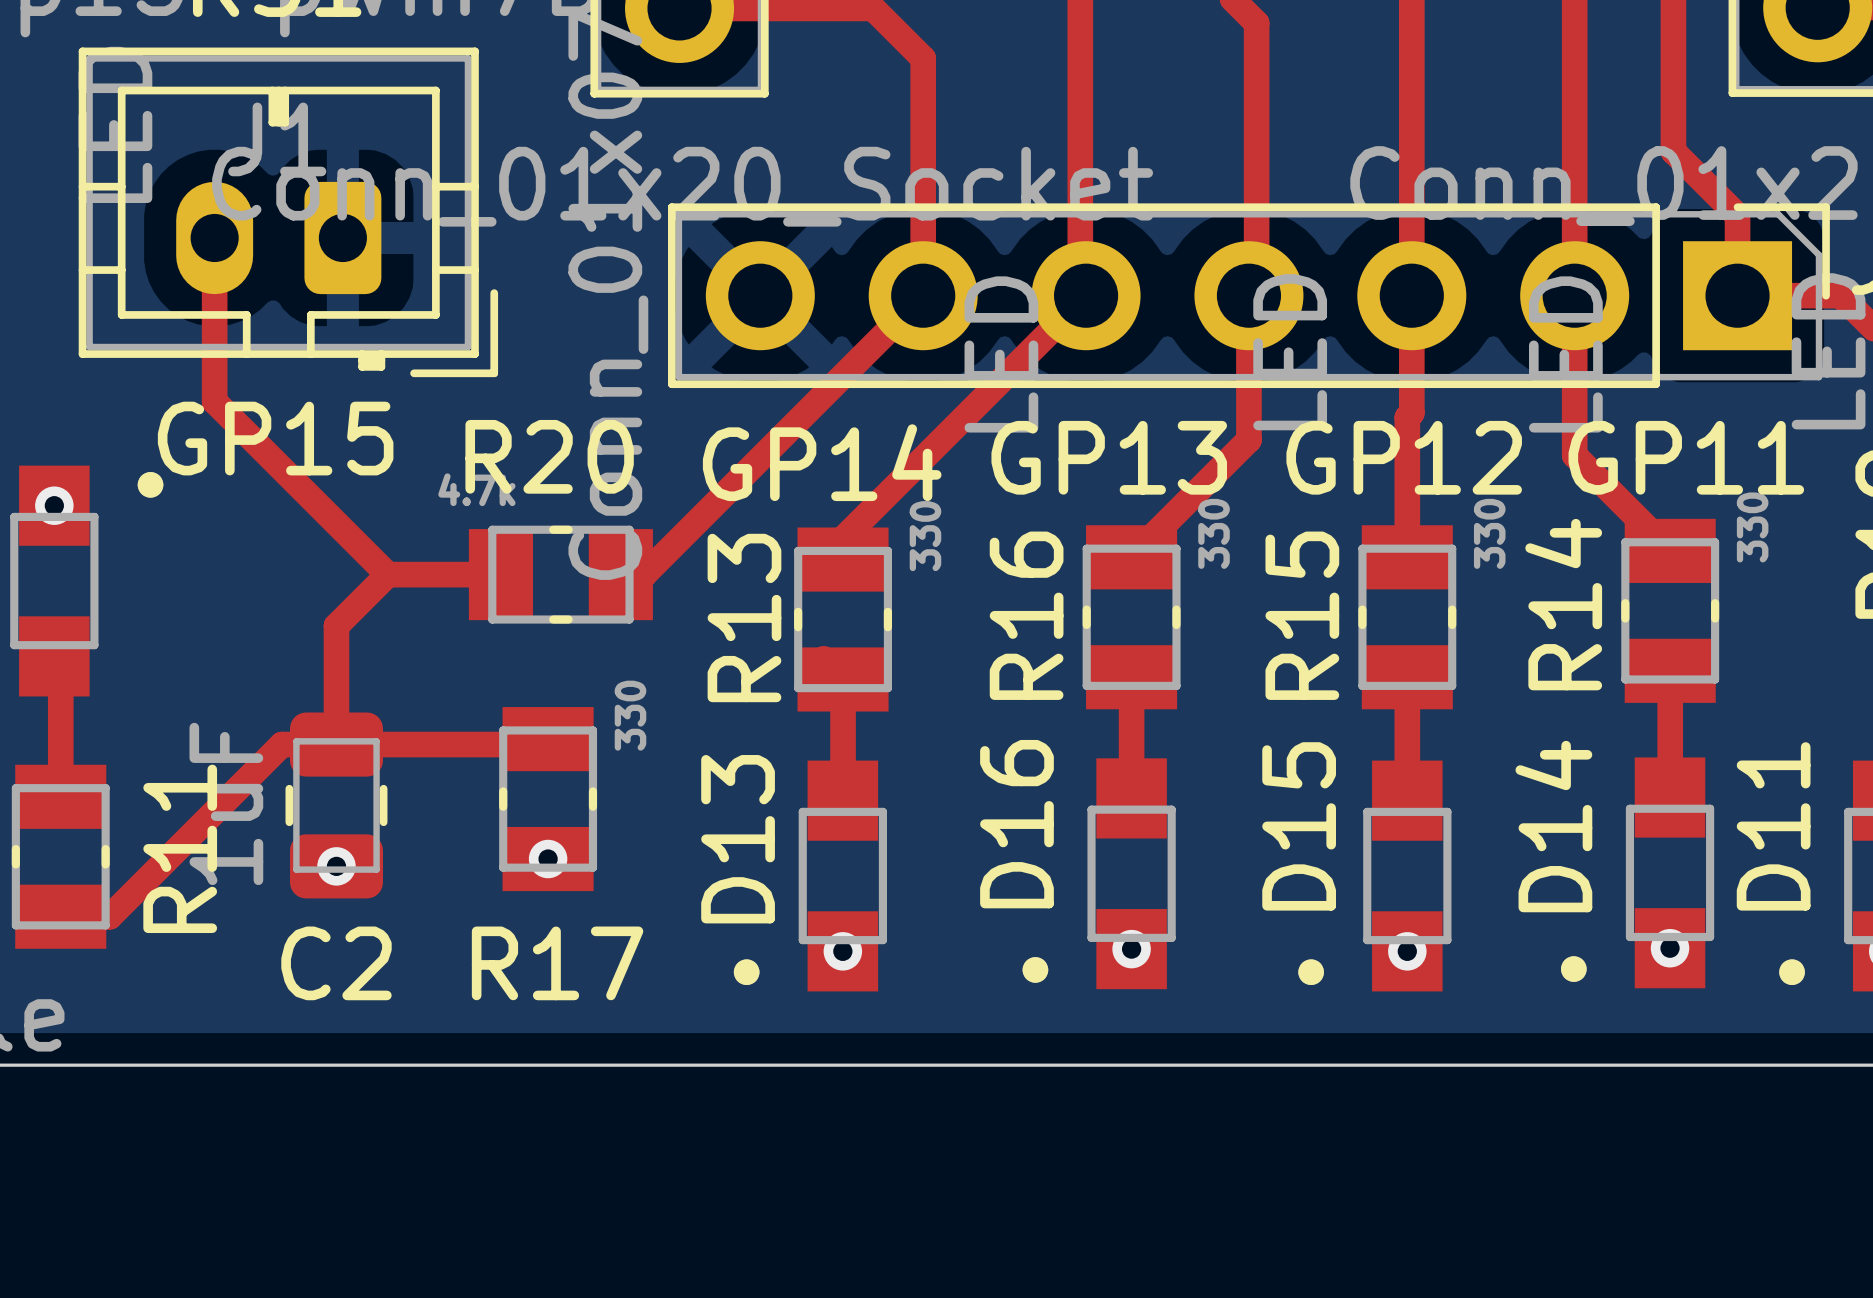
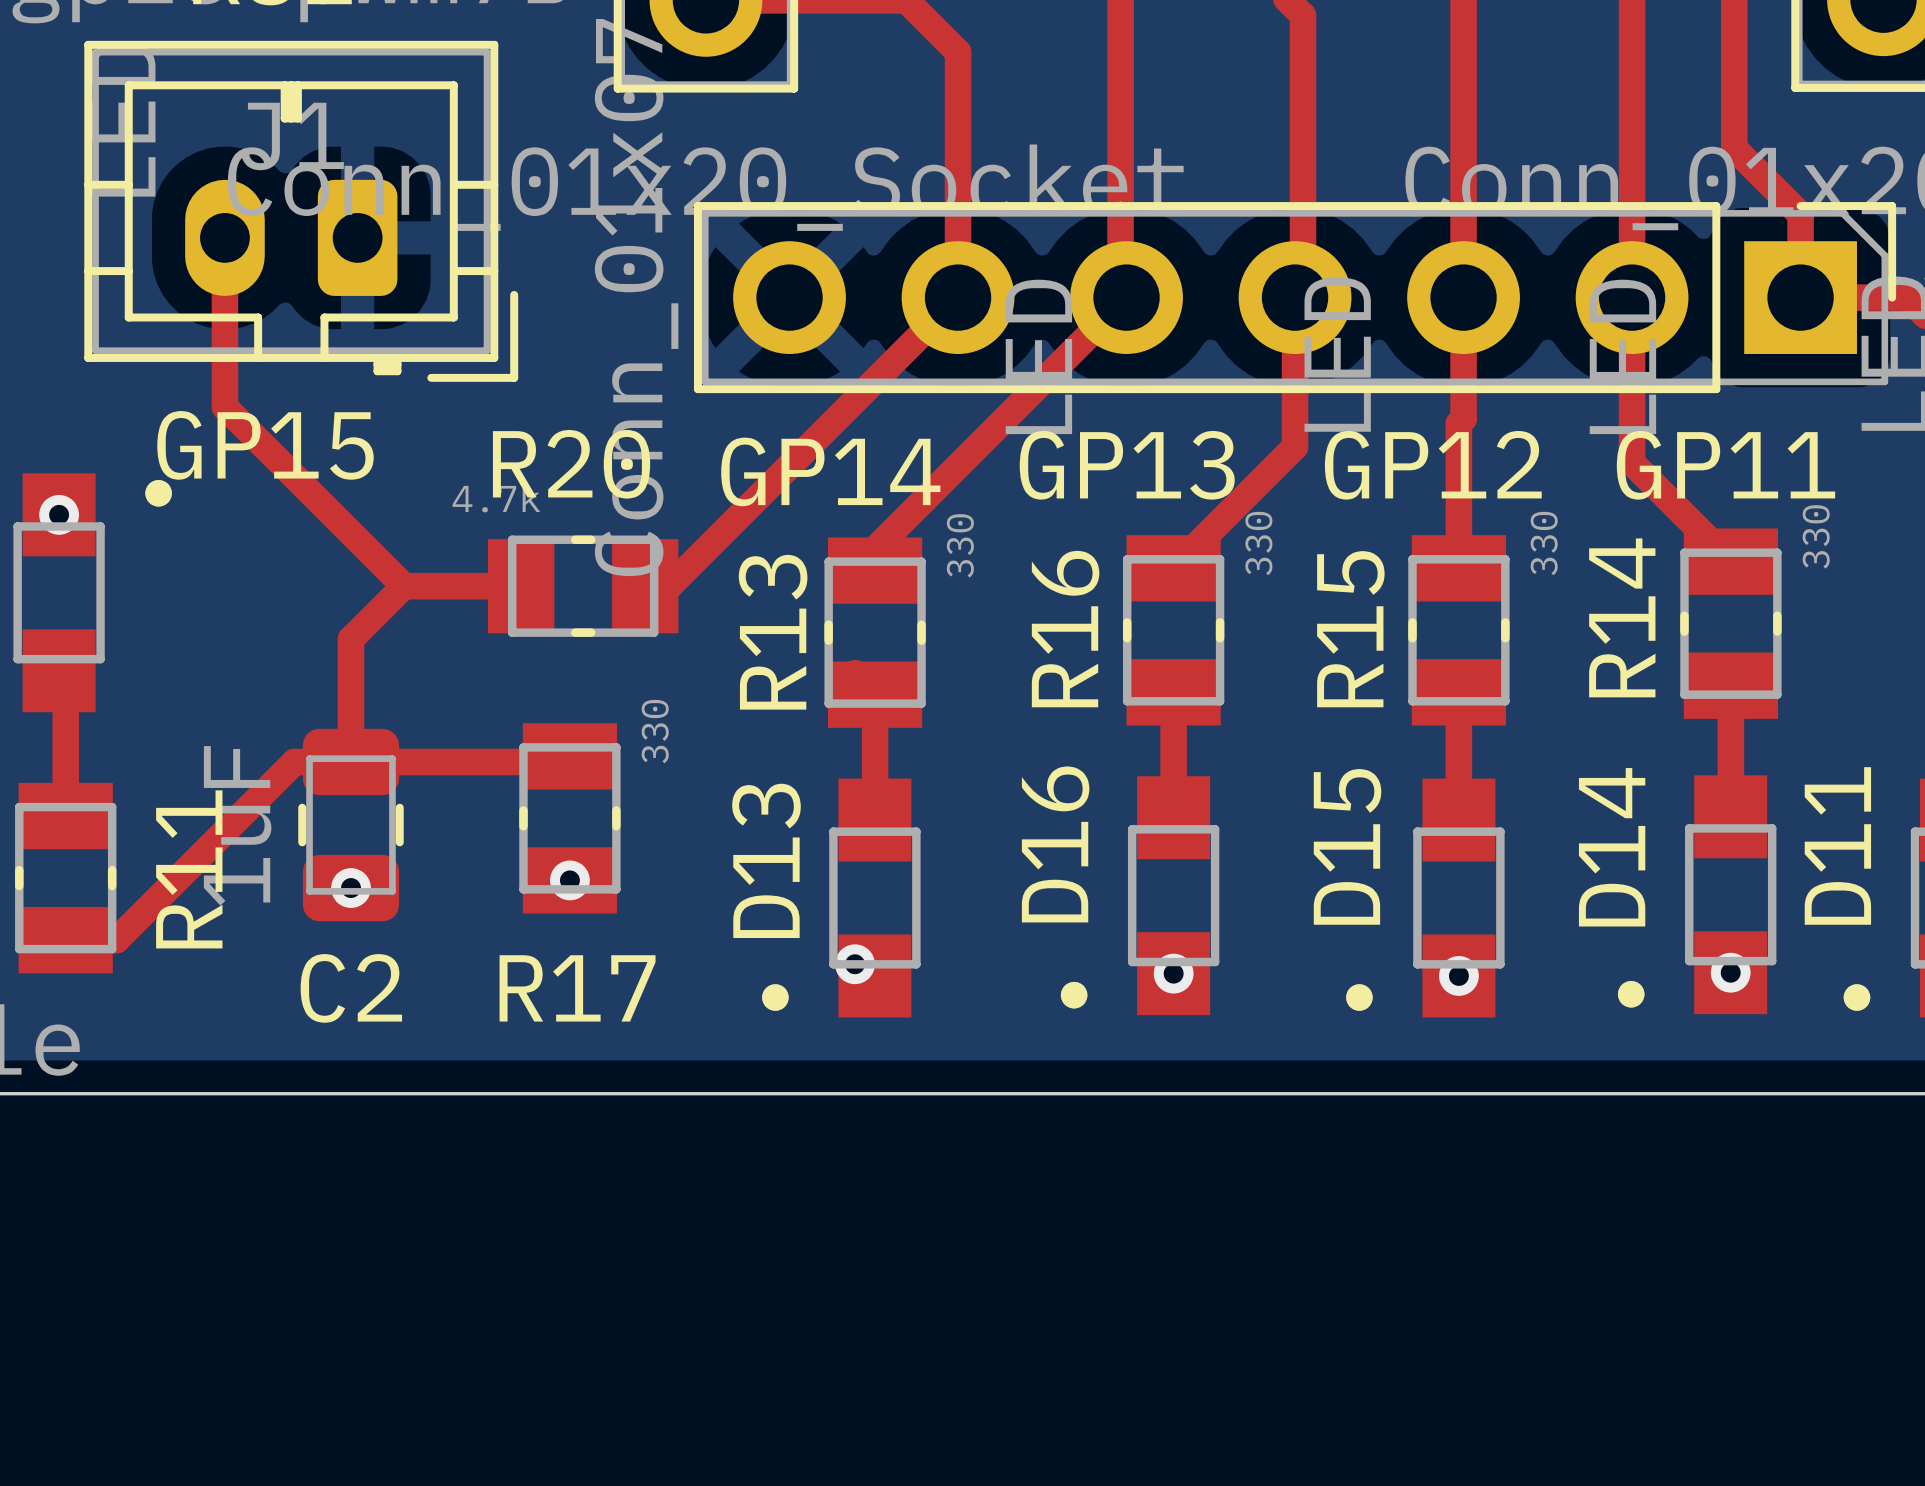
via position: (842, 951) -> (854, 964)

